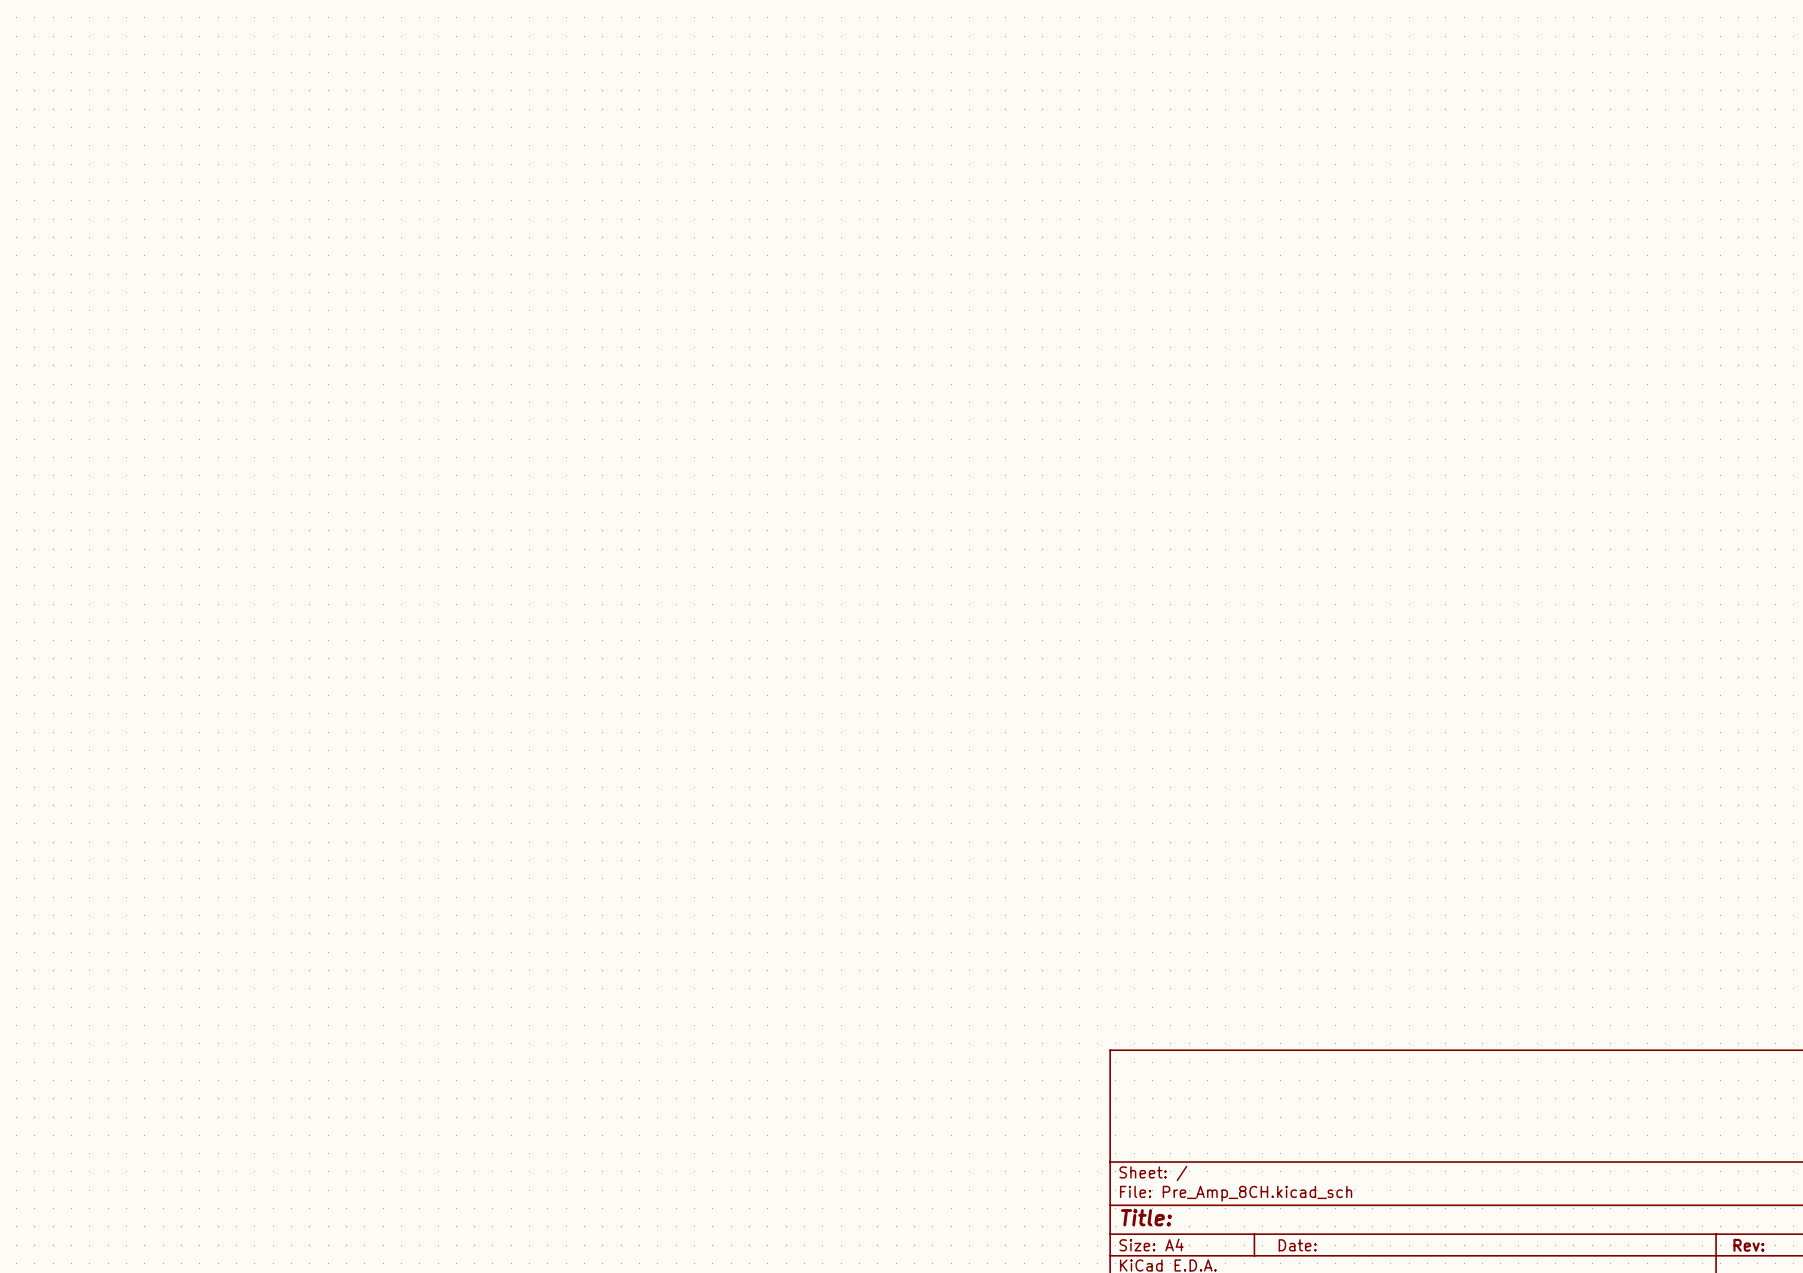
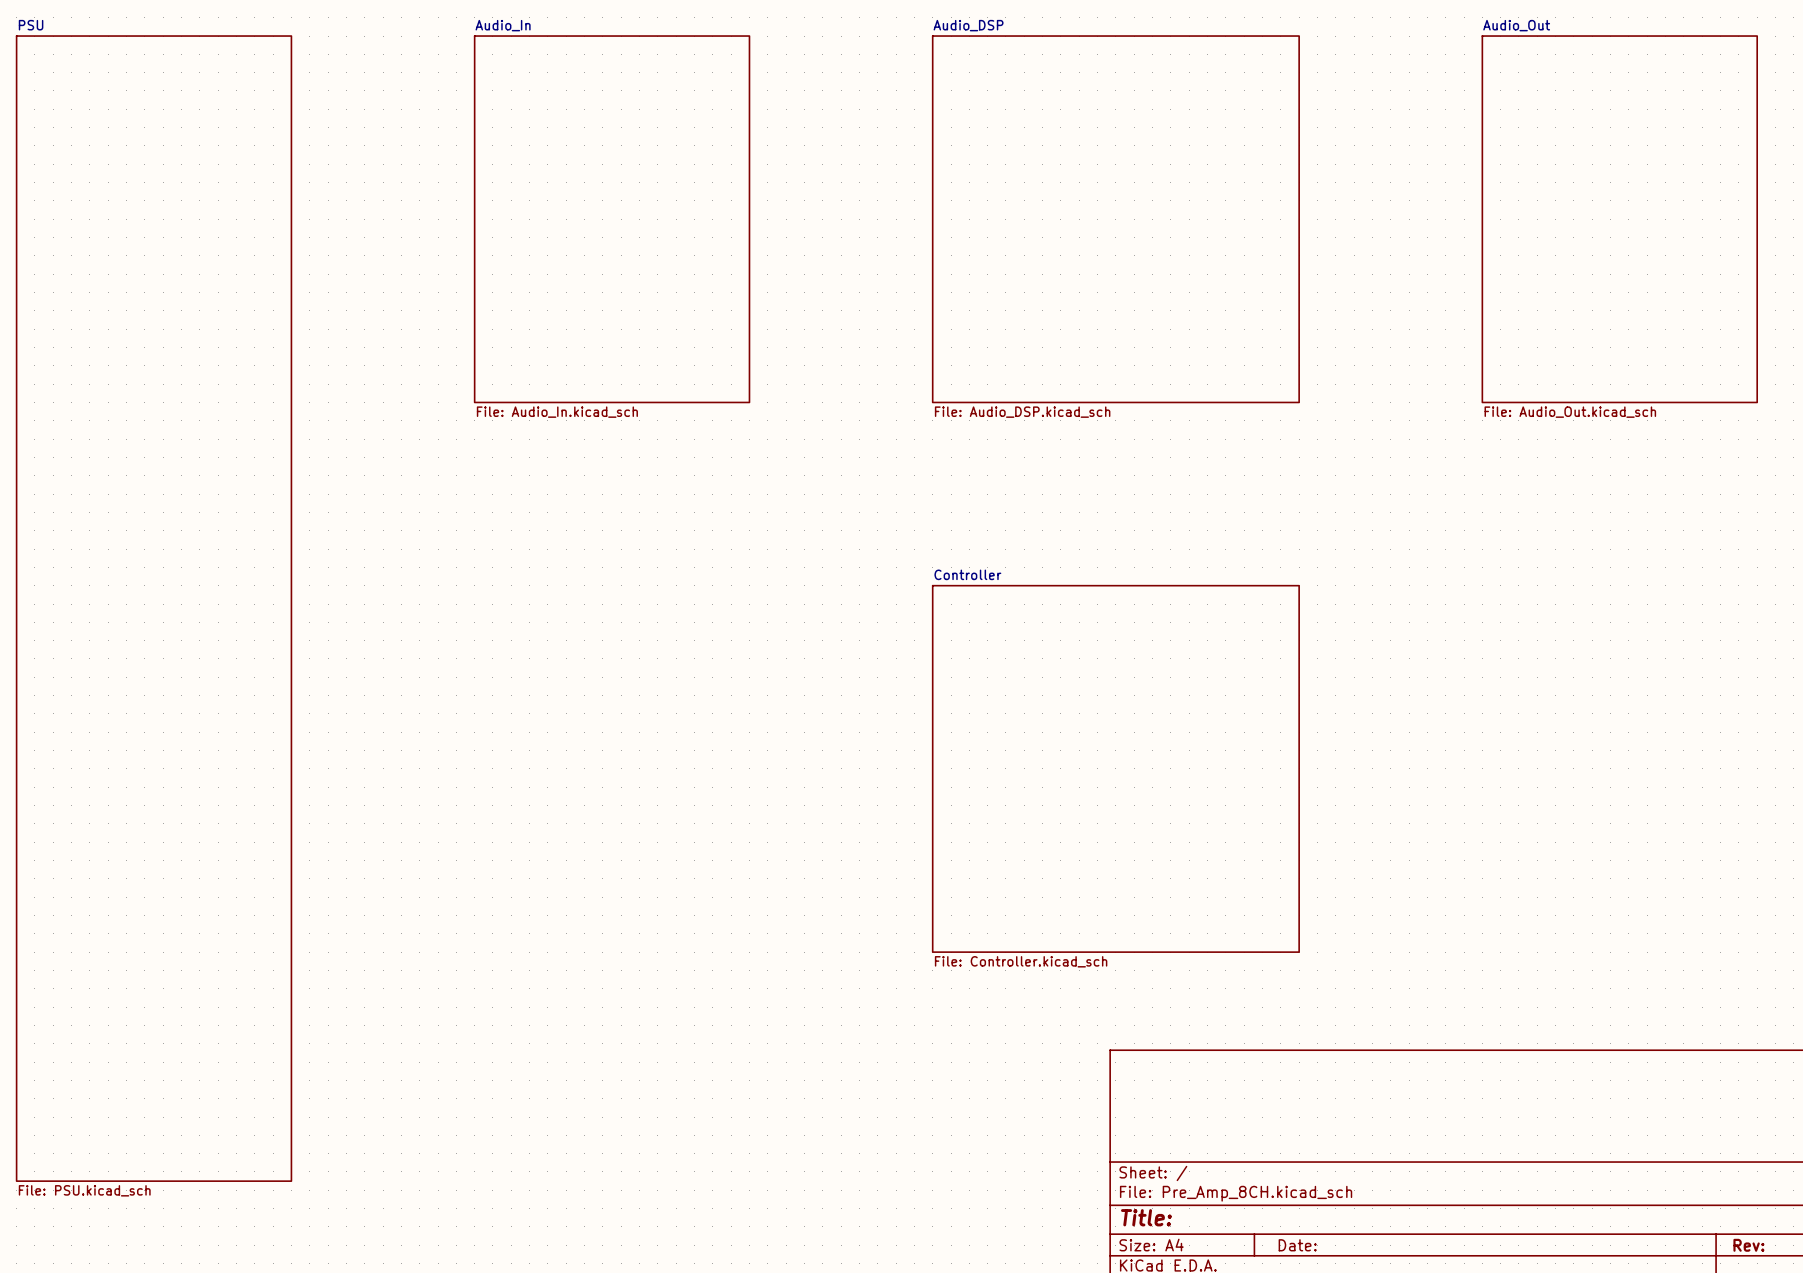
sheet Audio_In: none -> File: Audio_In.kicad_sch (612, 219)
sheet Audio_DSP: none -> File: Audio_DSP.kicad_sch (1115, 219)
sheet Audio_Out: none -> File: Audio_Out.kicad_sch (1619, 219)
sheet PSU: none -> File: PSU.kicad_sch (154, 608)
sheet Controller: none -> File: Controller.kicad_sch (1115, 768)

